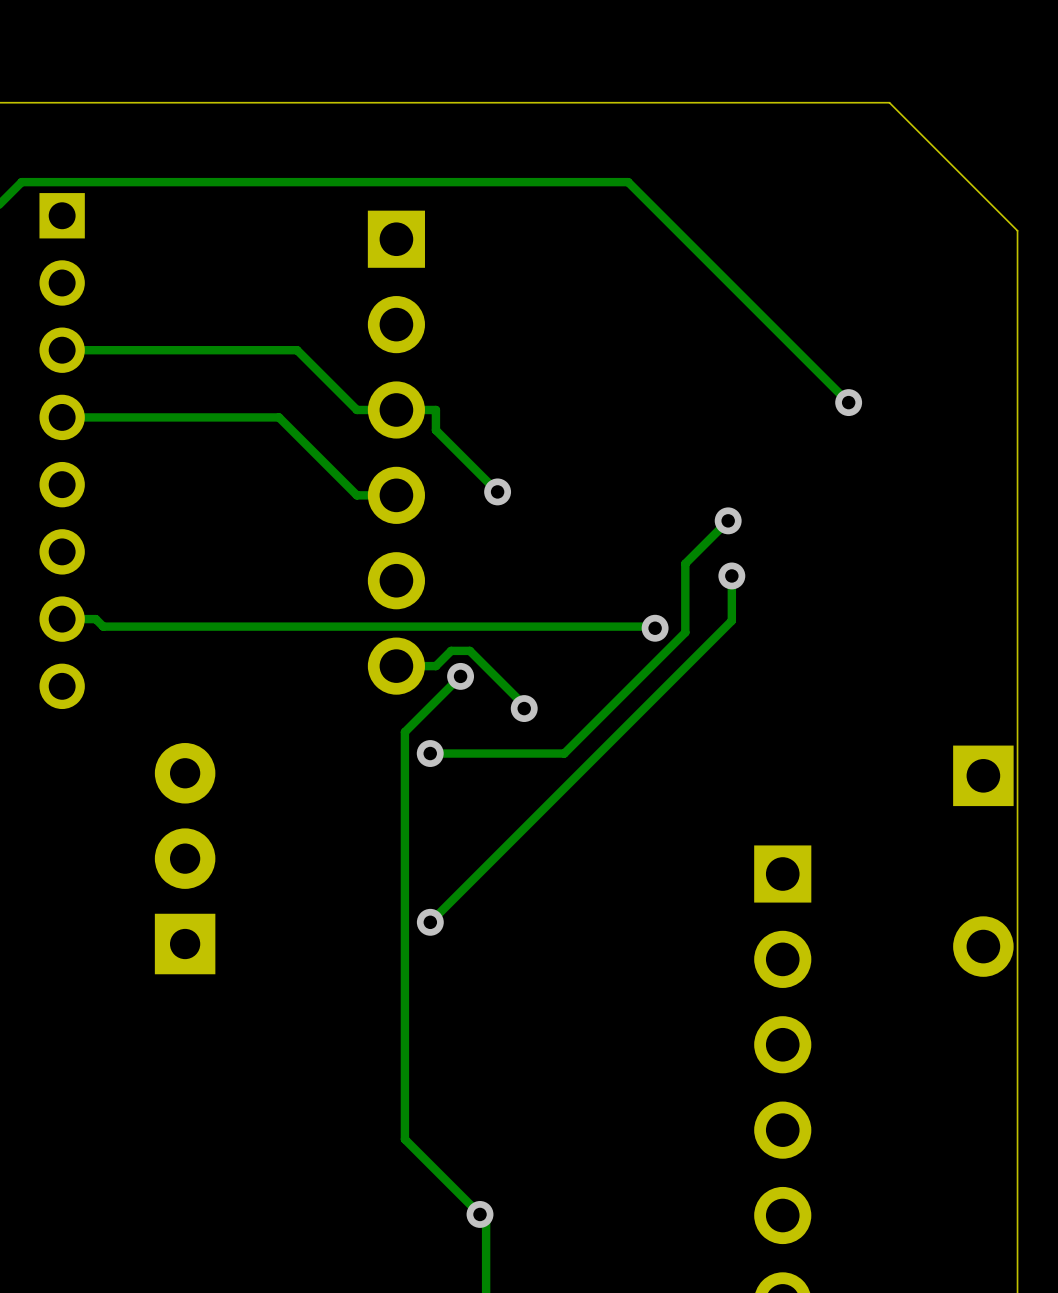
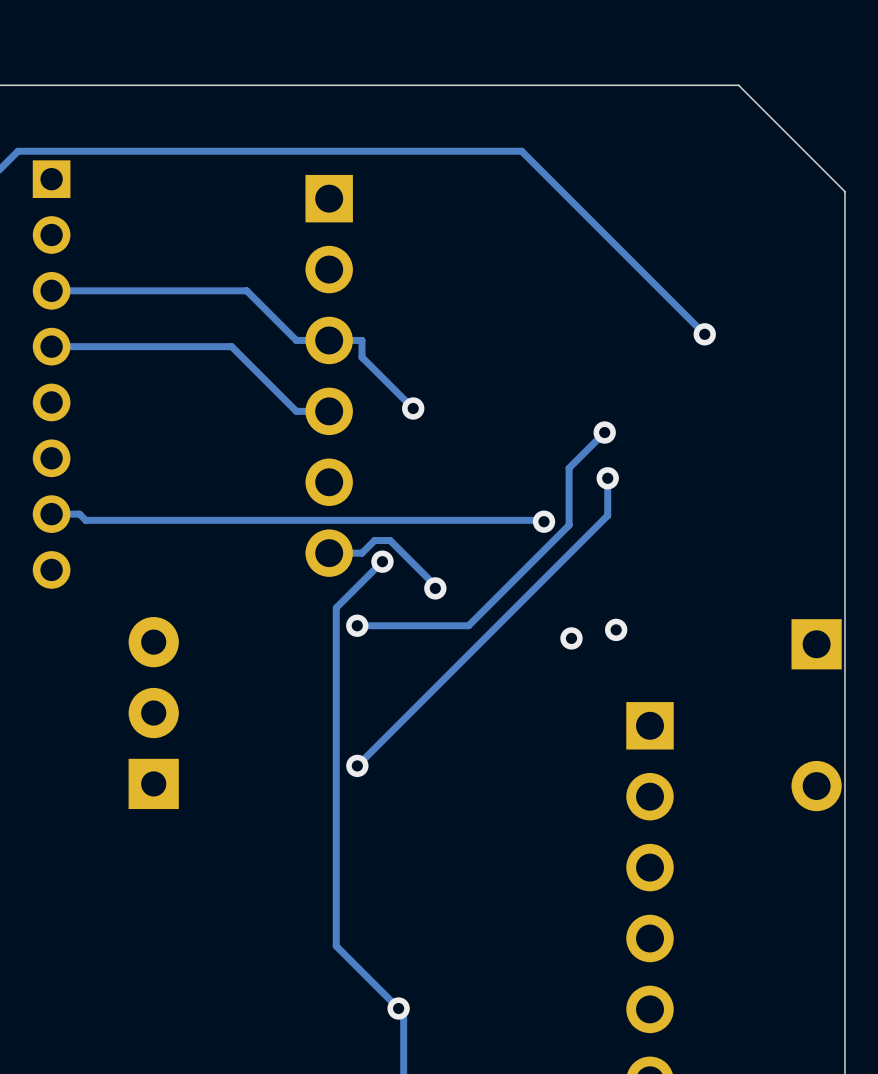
via: none -> (616, 629)
via: none -> (571, 638)

